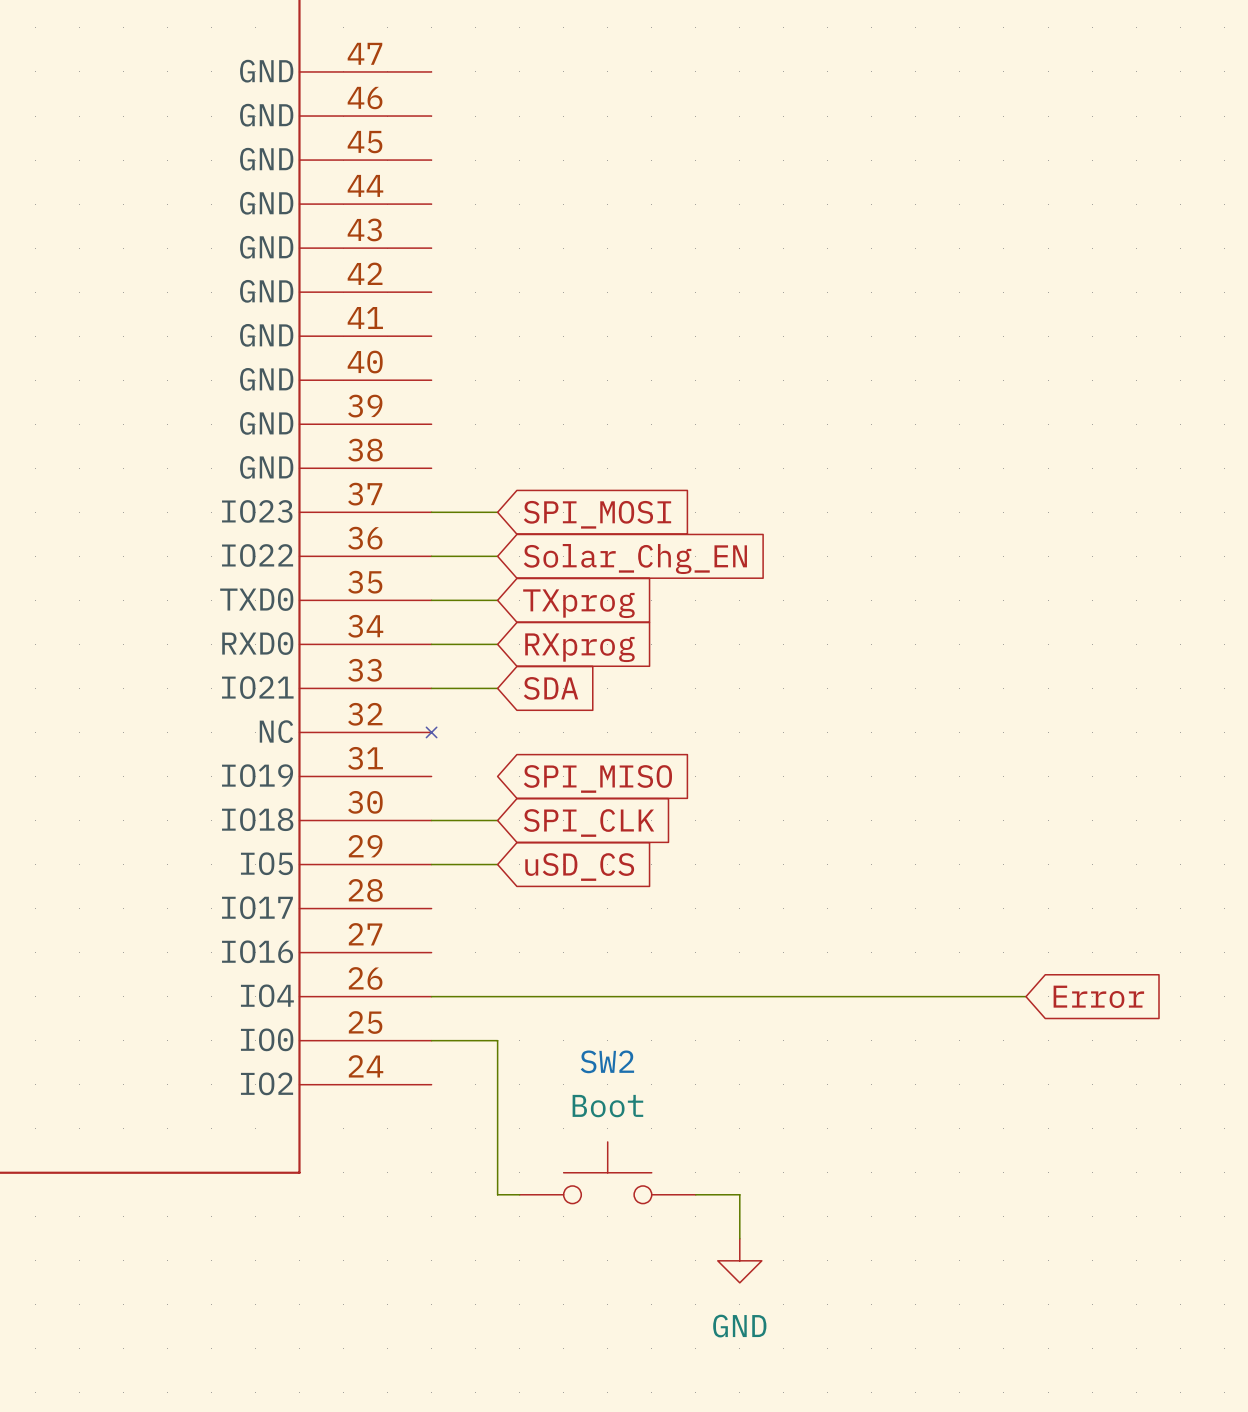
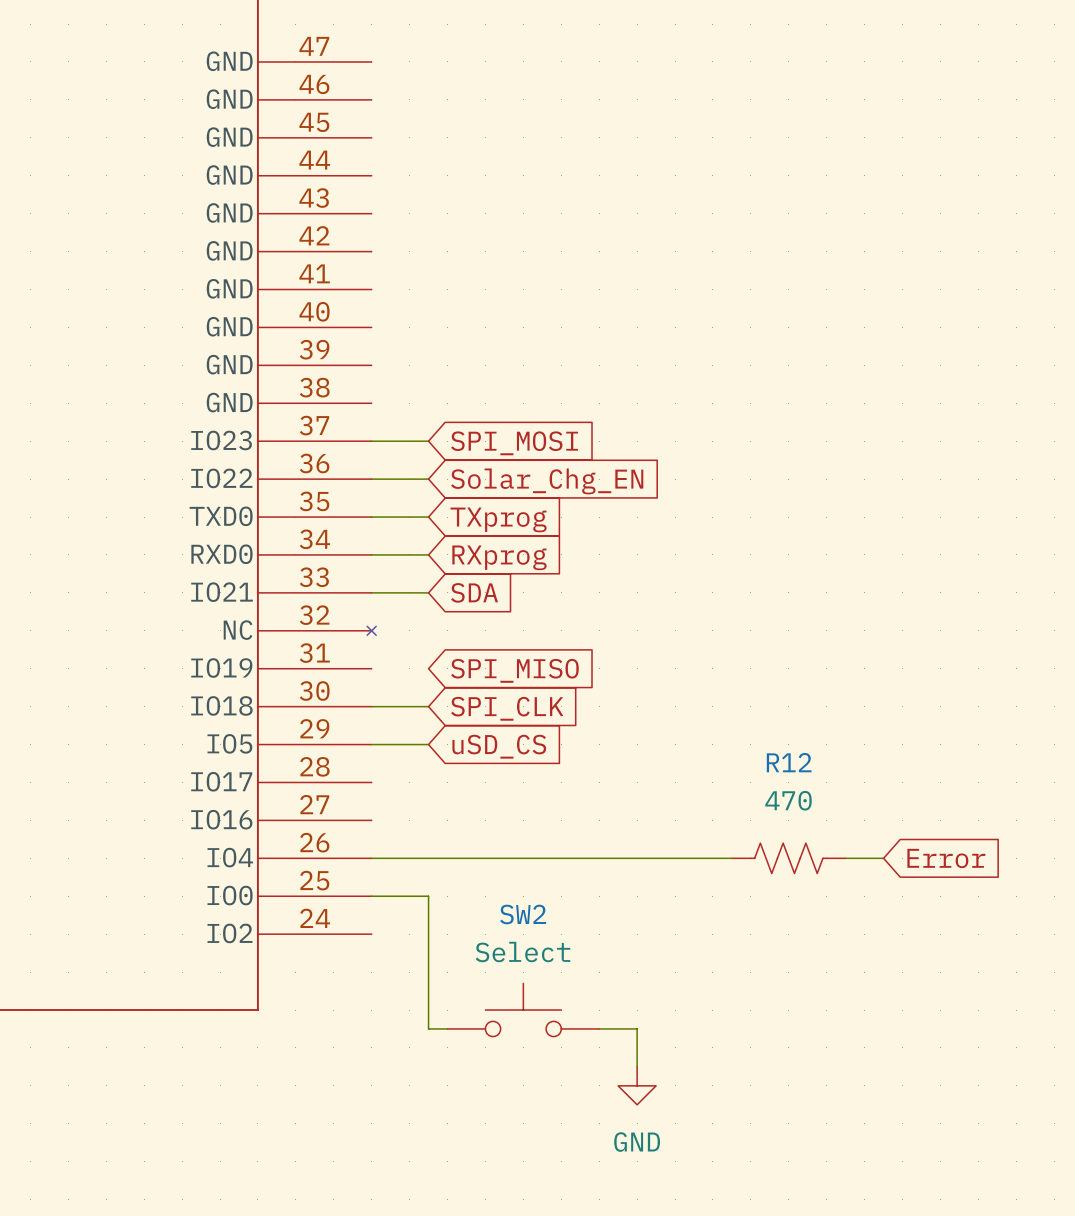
wire: (849, 996) (981, 996) -> none
R12: none -> 470 (788, 858)
SW2 value: Boot (607, 1106) -> Select (522, 952)

